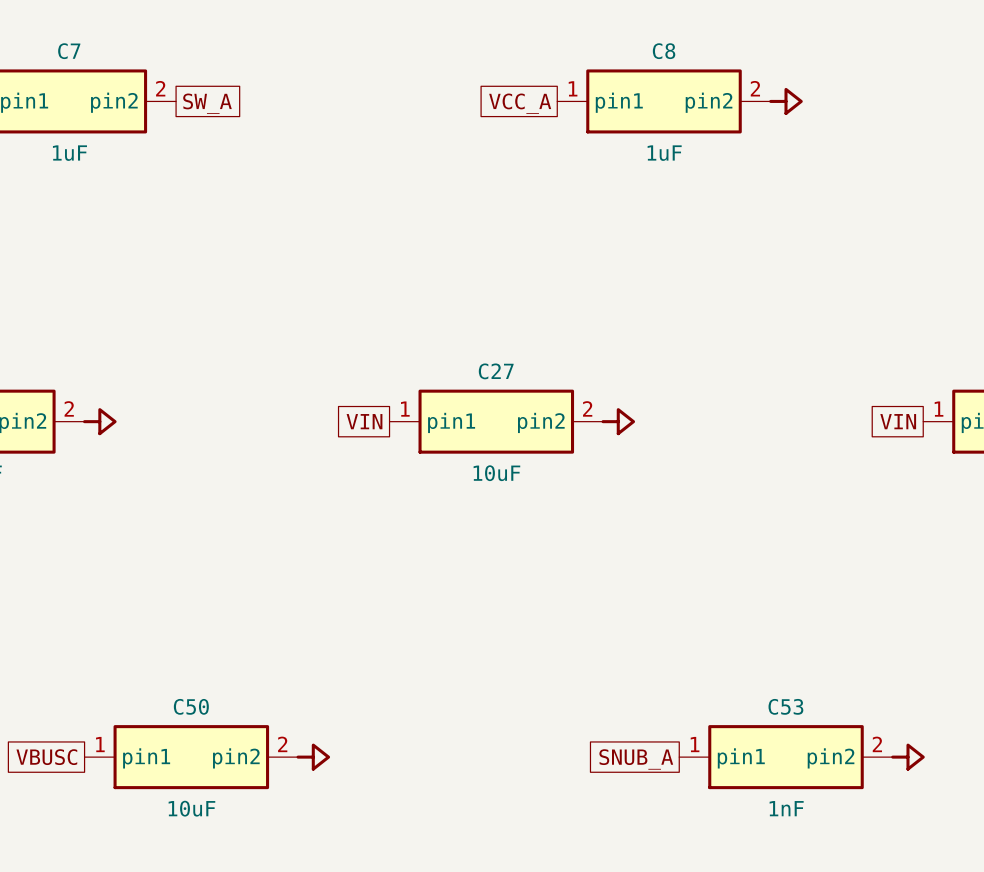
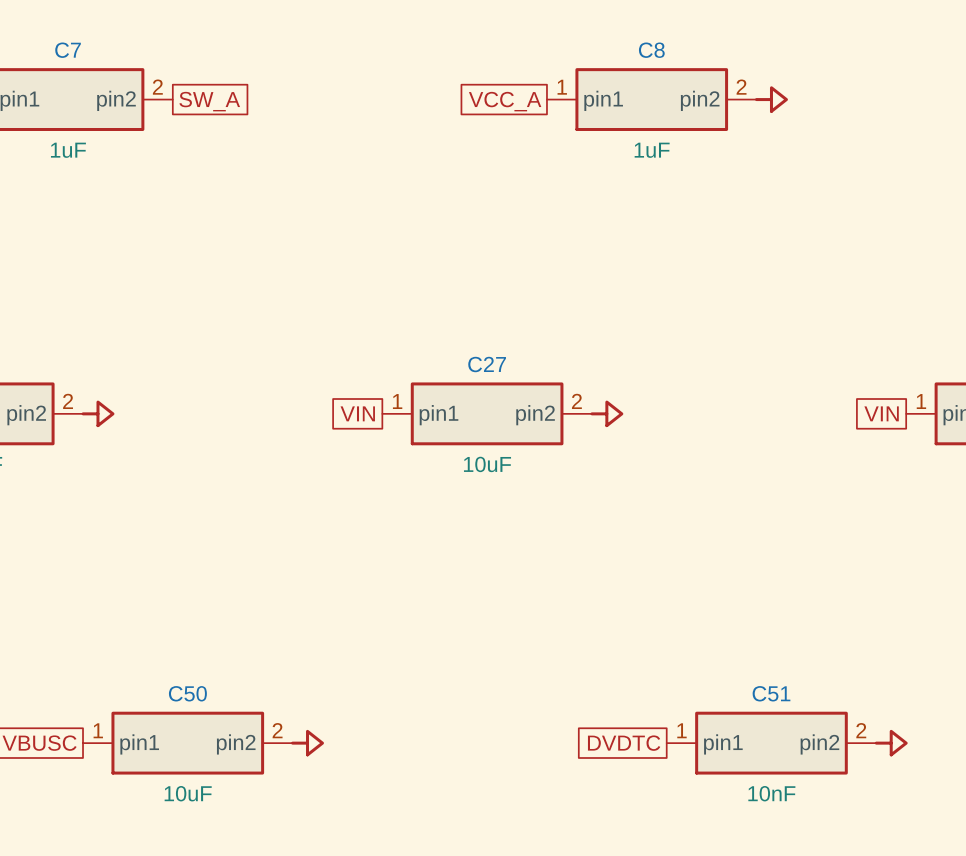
C53 name: C53 (785, 706) -> C51 (771, 693)
global label: SNUB_A (636, 759) -> DVDTC (624, 743)
C53 value: 1nF (786, 808) -> 10nF (771, 793)

